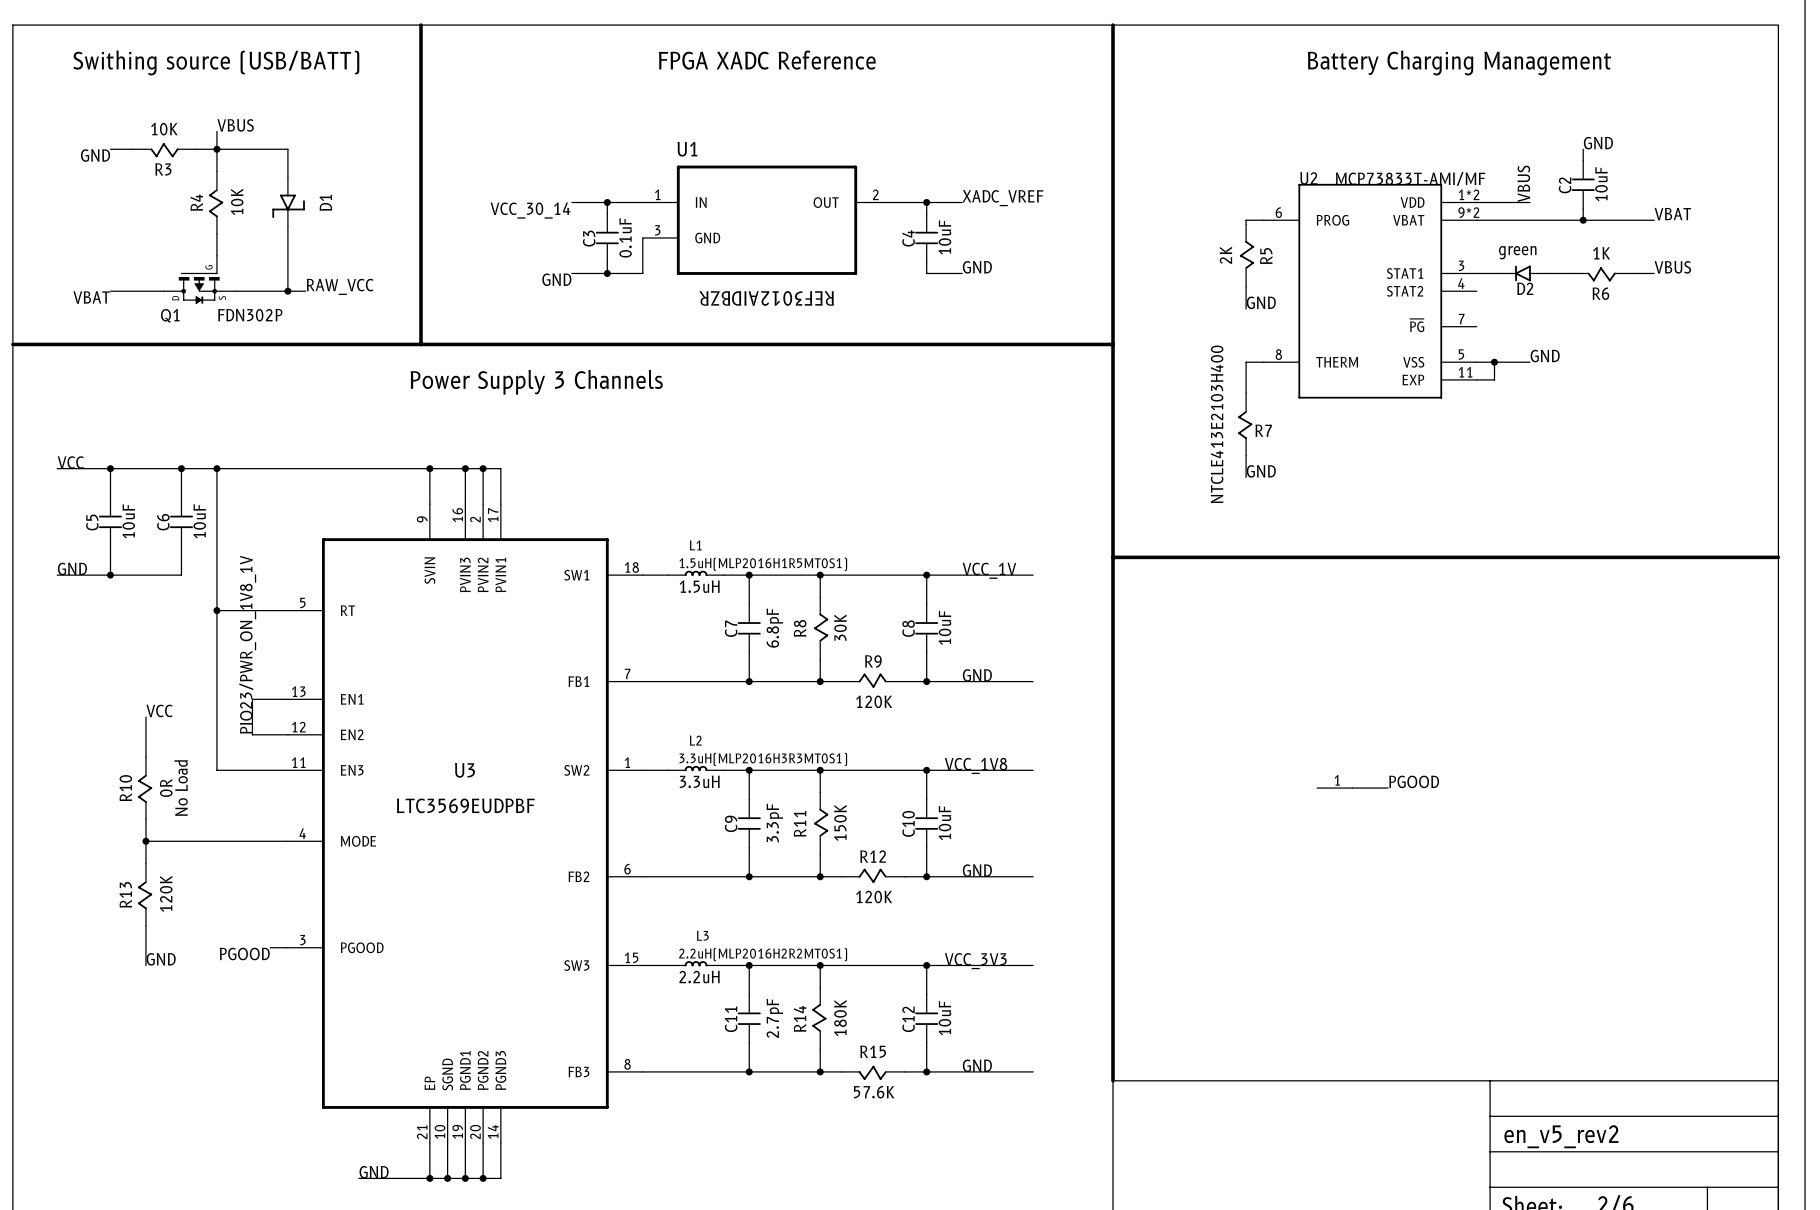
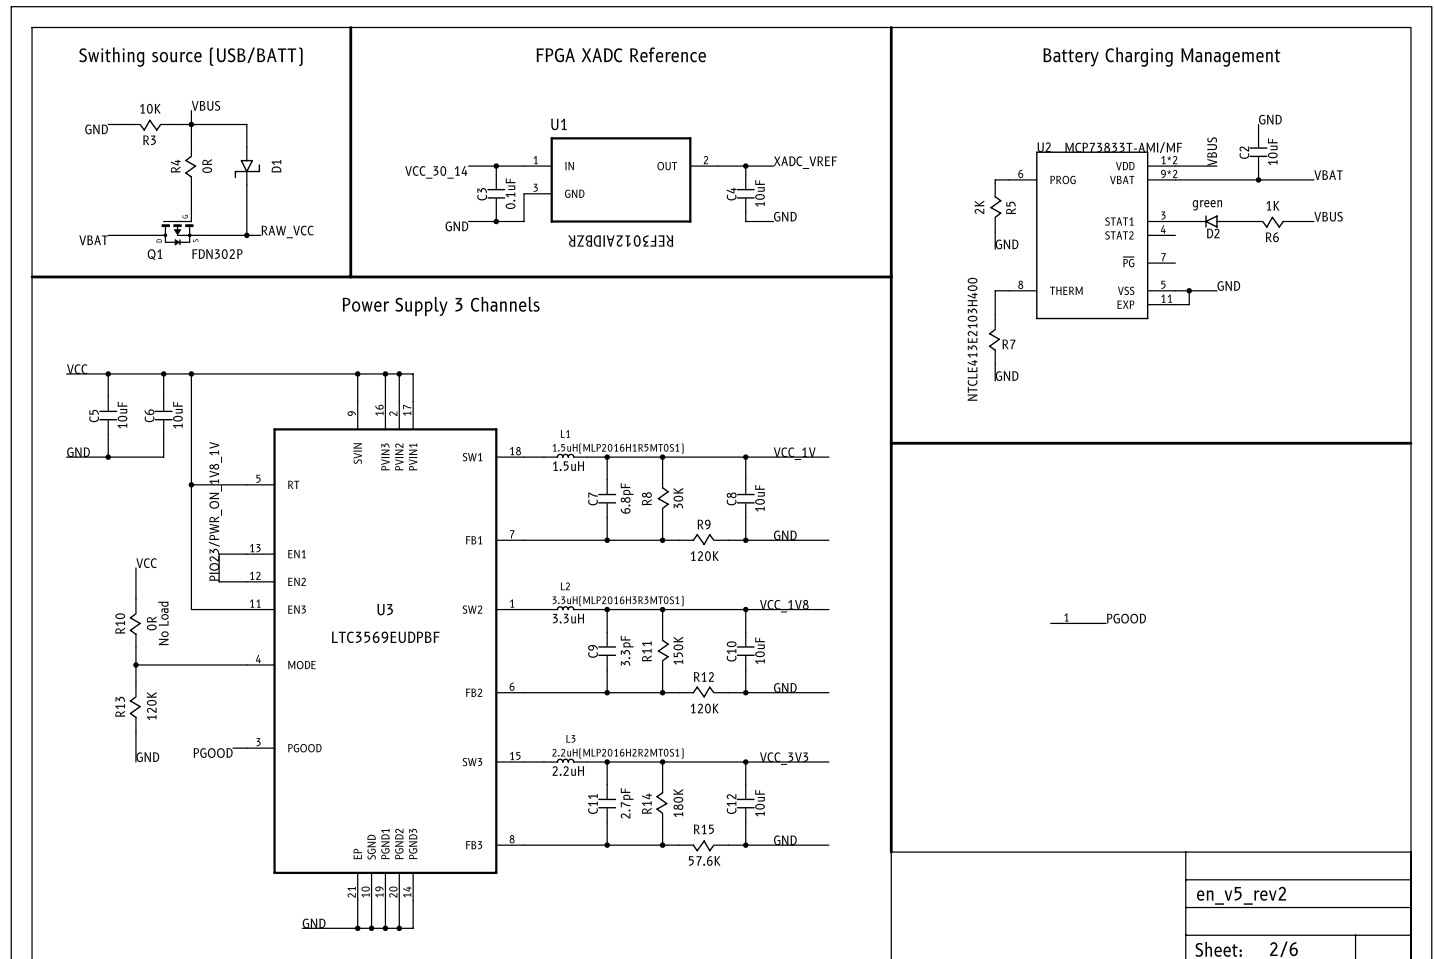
R4 value: 10K (237, 201) -> 0R (207, 166)

